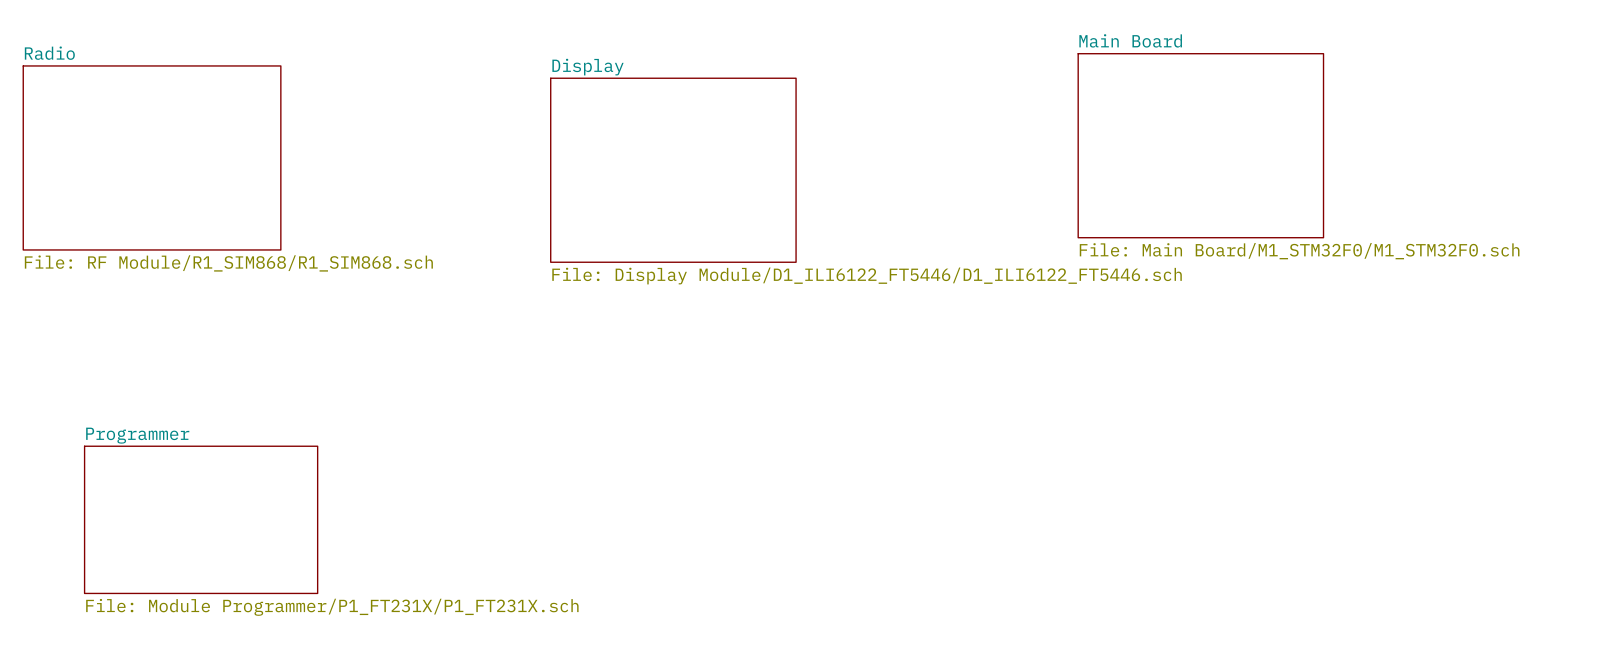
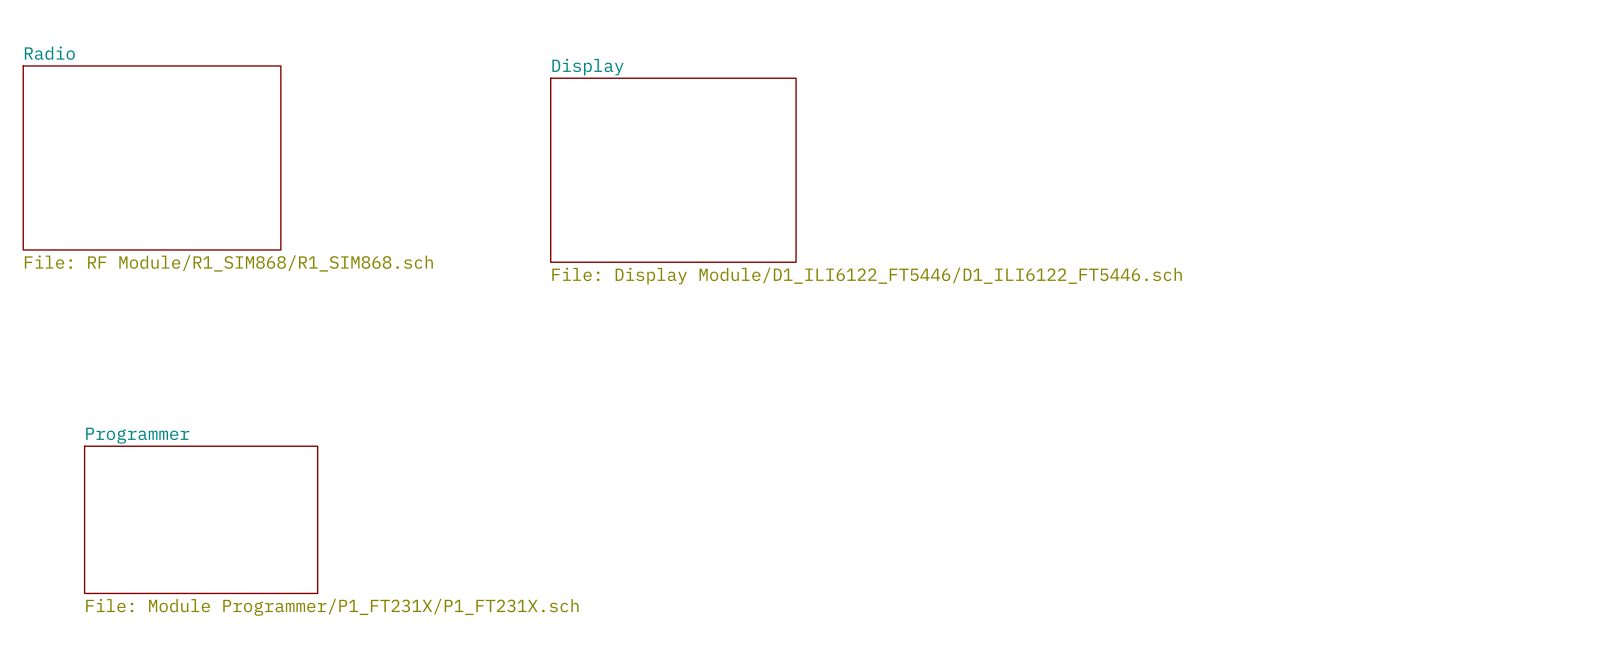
sheet Main Board: File: Main Board/M1_STM32F0/M1_STM32F0.sch (1200, 145) -> none

